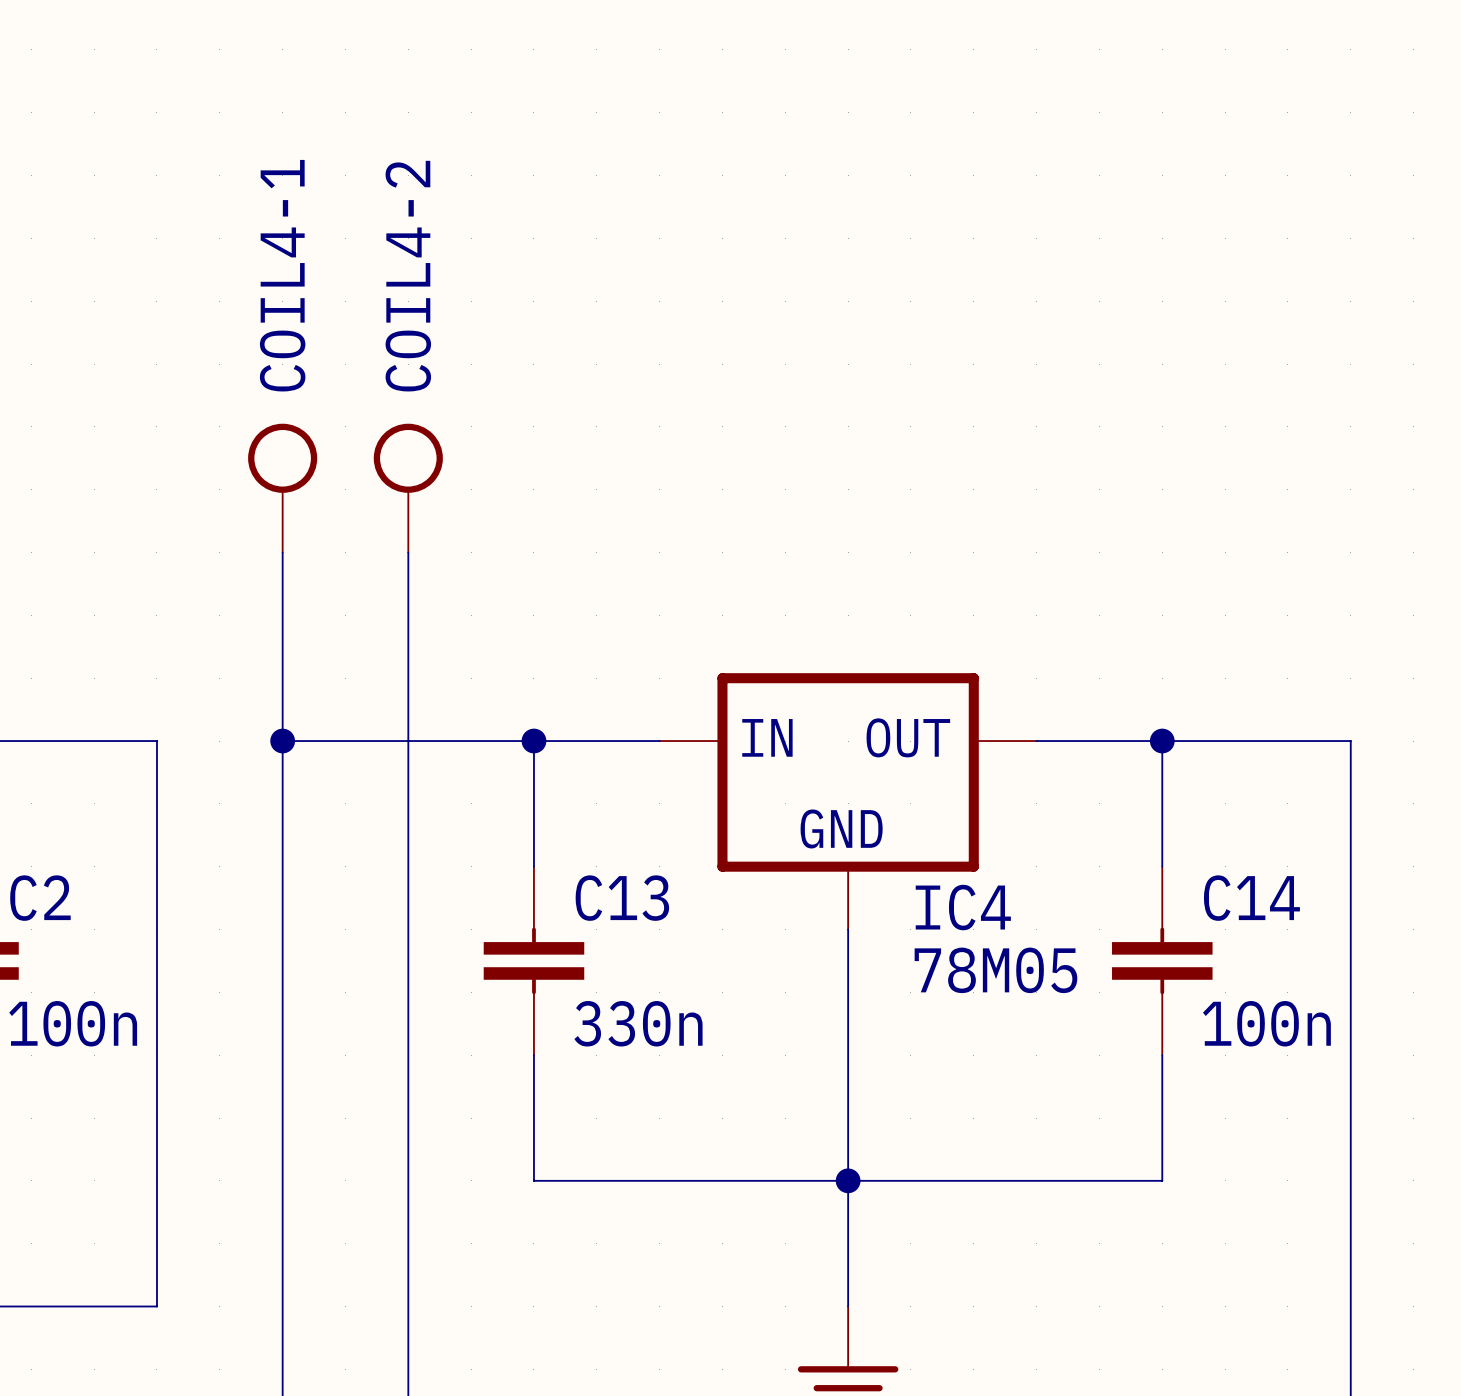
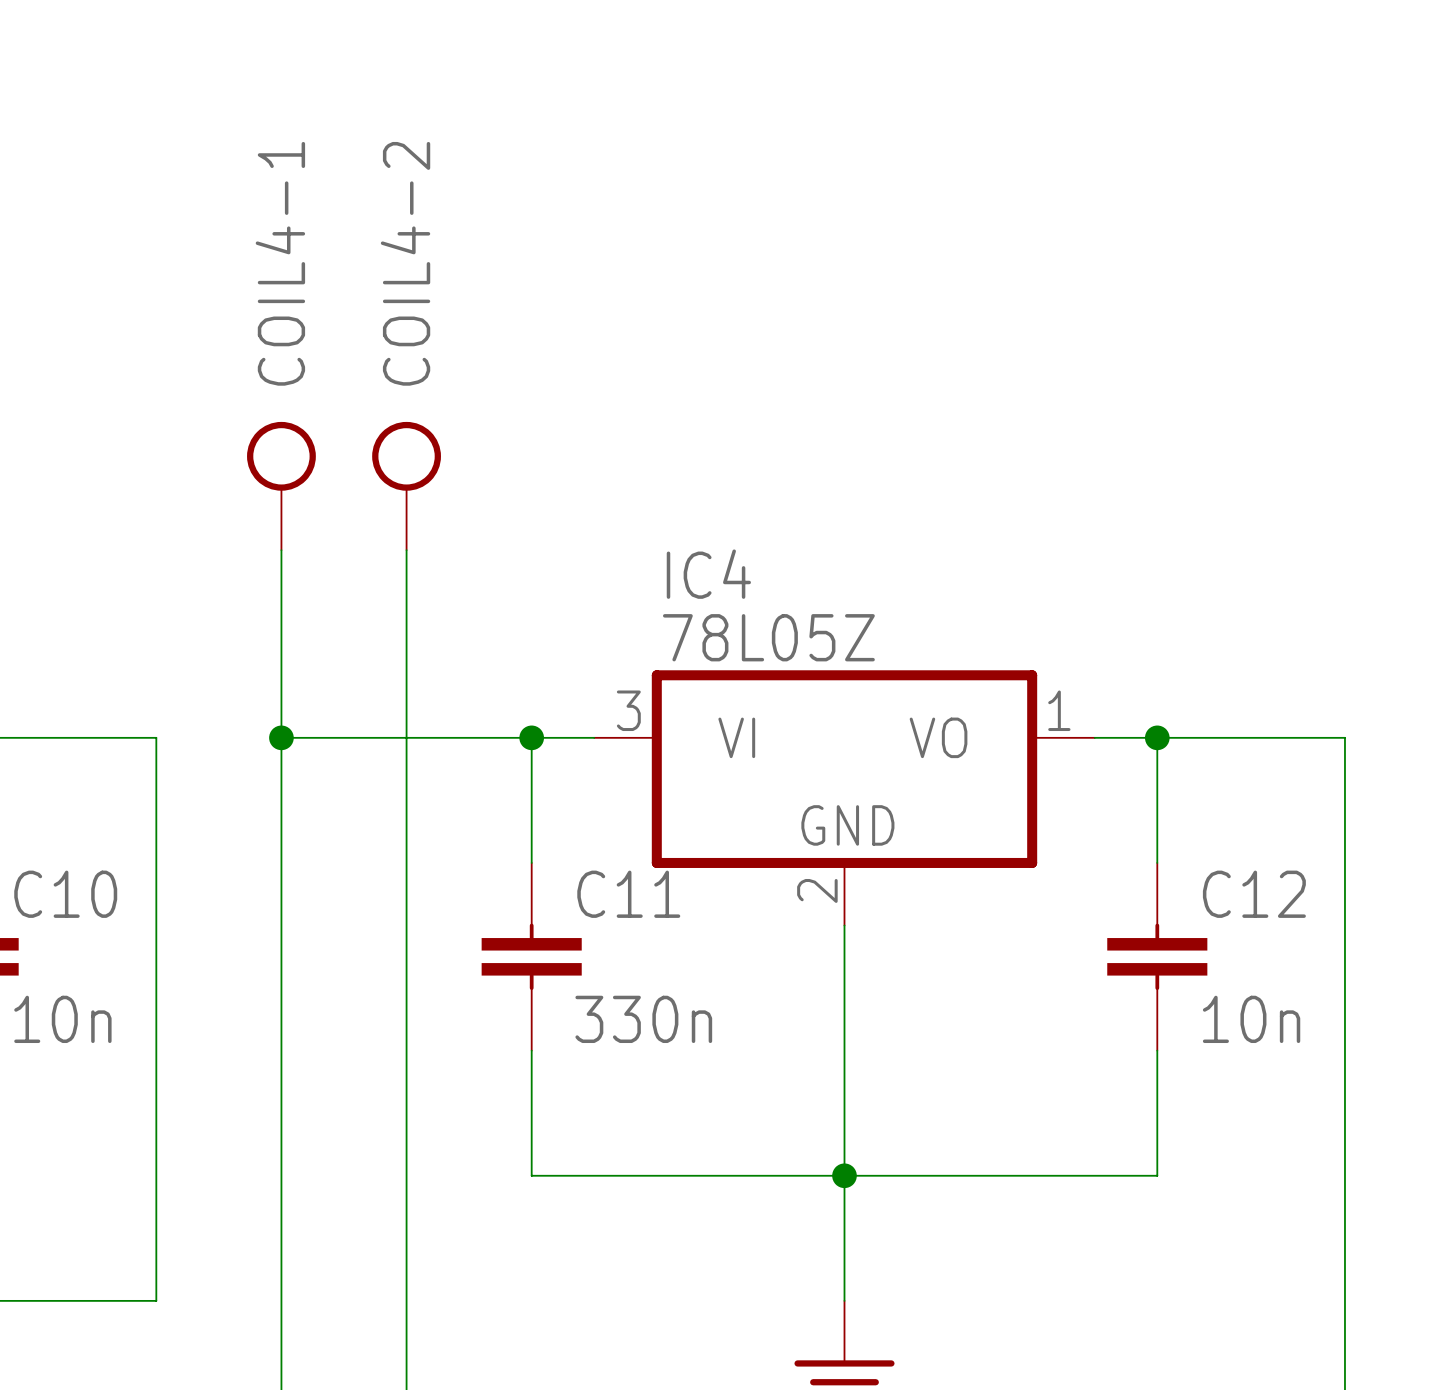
IC4 symbol: [659, 673, 1037, 930] -> [594, 670, 1095, 926]
C2 name: C2 (40, 898) -> C10 (65, 894)
C13 name: C13 (622, 898) -> C11 (628, 894)
C14 name: C14 (1251, 898) -> C12 (1254, 894)
IC4 name position: IC4 (963, 907) -> IC4 (708, 574)
IC4 value: 78M05 (995, 970) -> 78L05Z (768, 637)
C2 value: 100n (73, 1023) -> 10n (62, 1019)
C14 value: 100n (1266, 1023) -> 10n (1251, 1019)

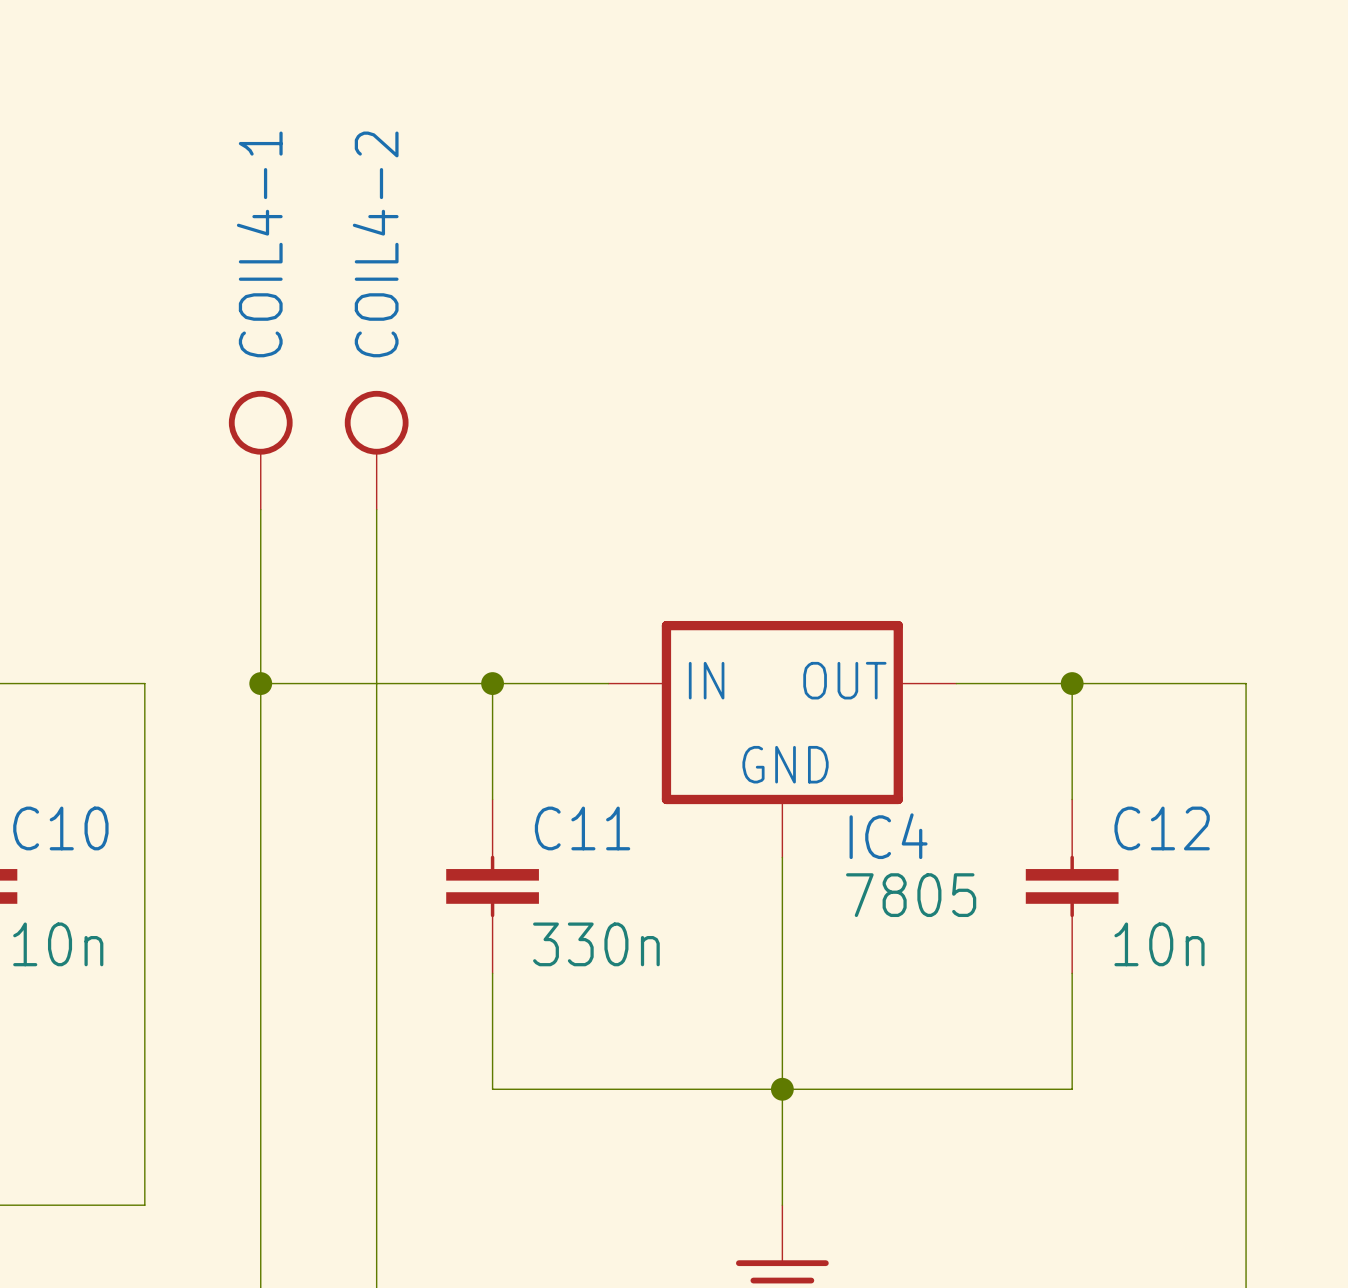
IC4 name position: IC4 (708, 574) -> IC4 (888, 836)
IC4 value: 78L05Z (768, 637) -> 7805 (911, 895)
IC4 symbol: [594, 670, 1095, 926] -> [608, 620, 957, 858]

